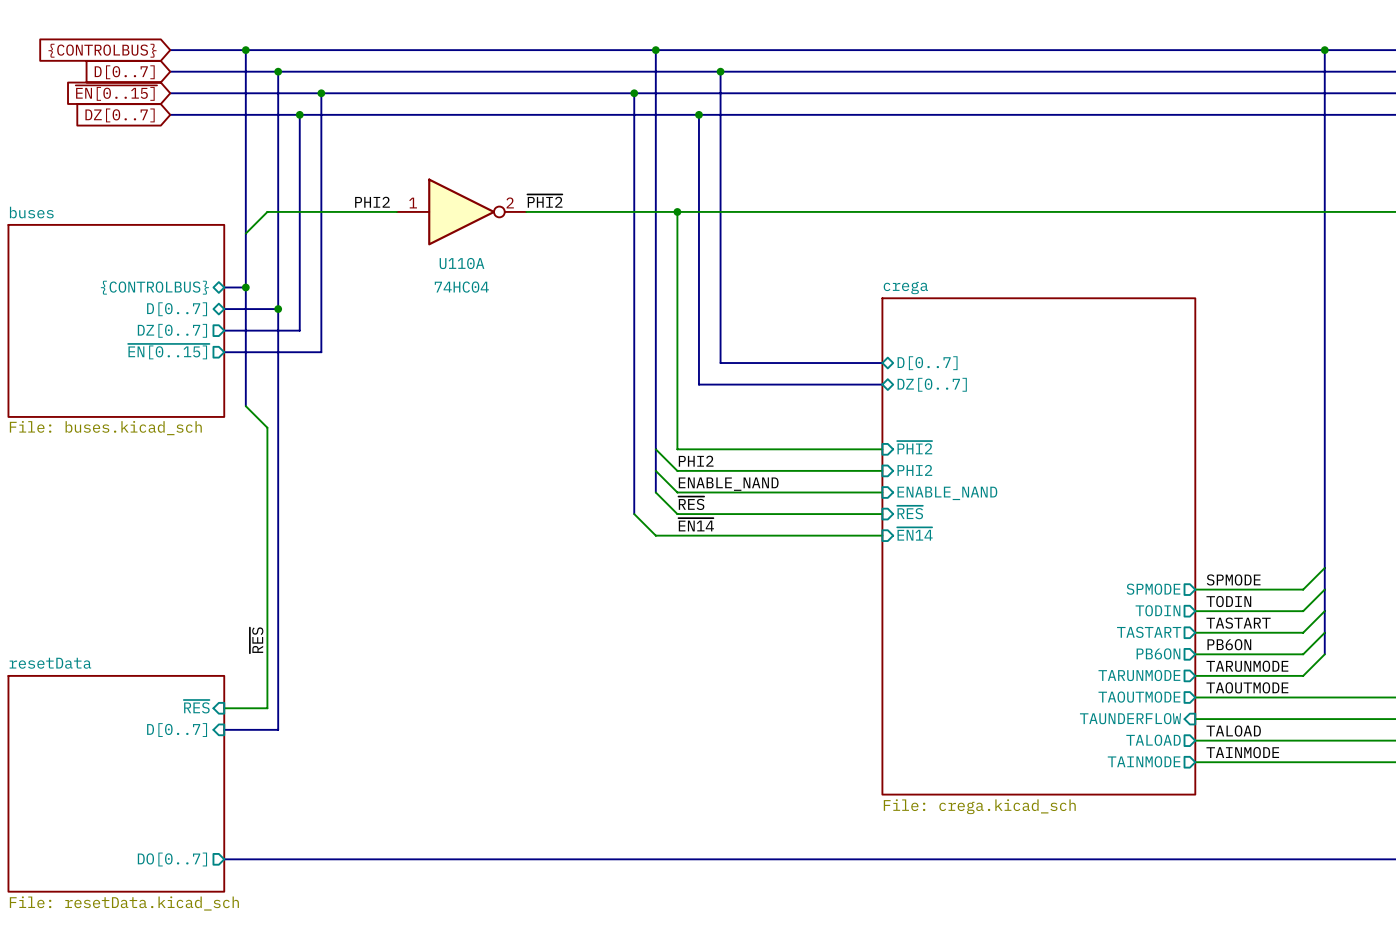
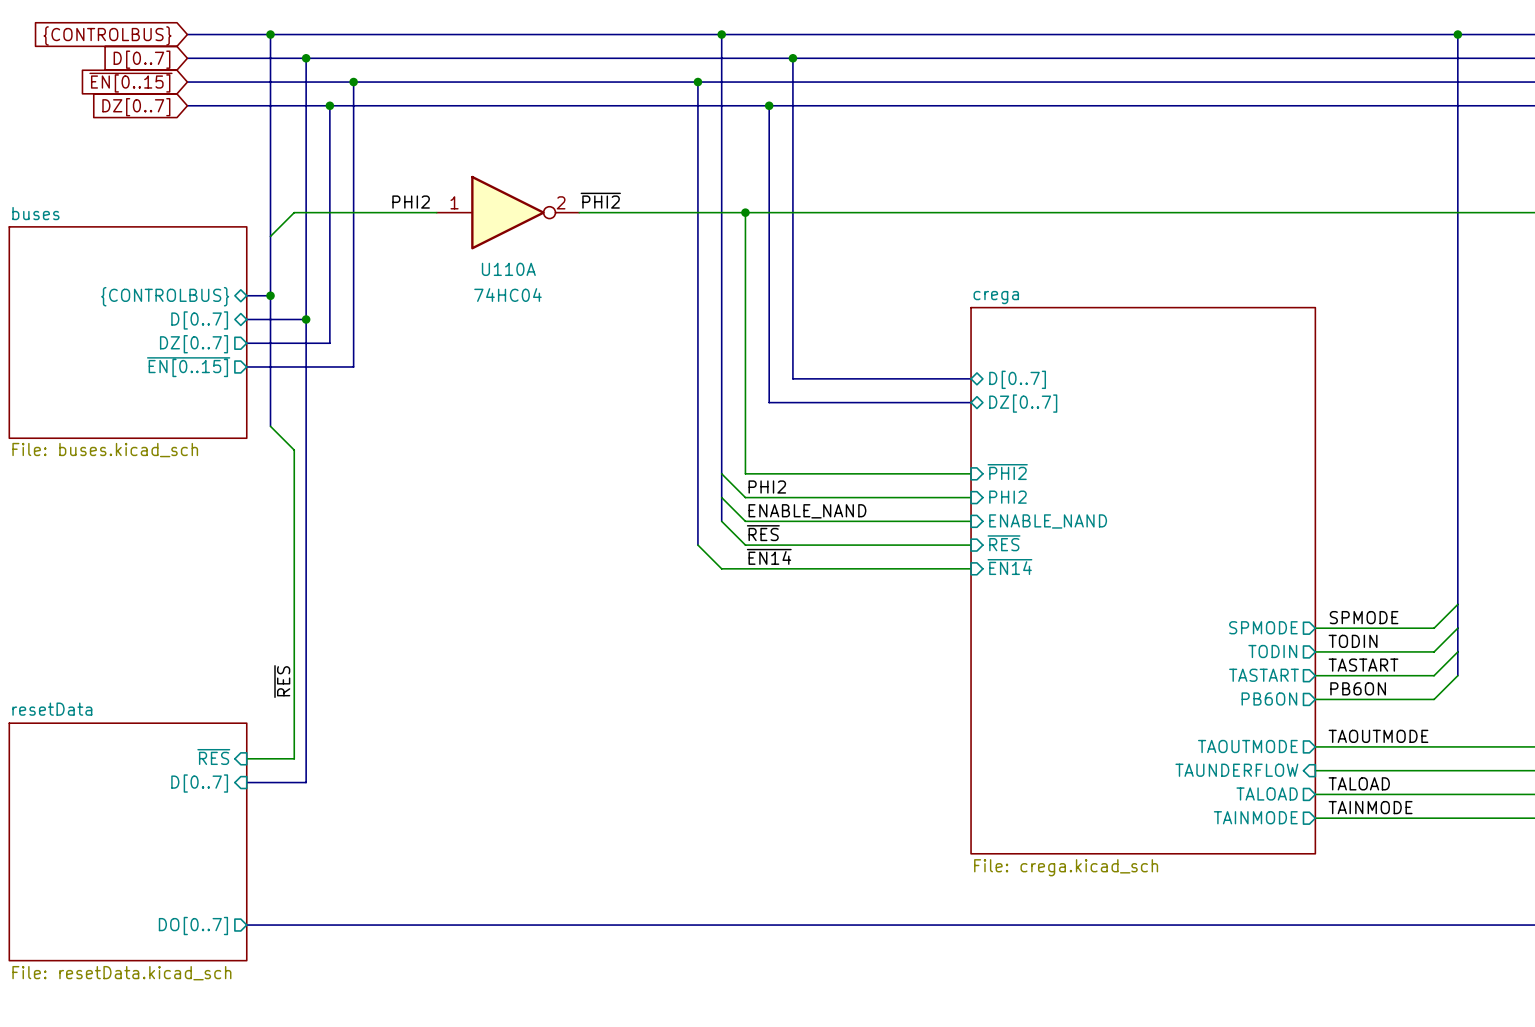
bus: (1324, 632) (1324, 654) -> none
wire: (1324, 654) (1303, 675) (1195, 675) -> none
label: TARUNMODE (1247, 666) -> none
sheet pin: TARUNMODE (1139, 675) -> none

